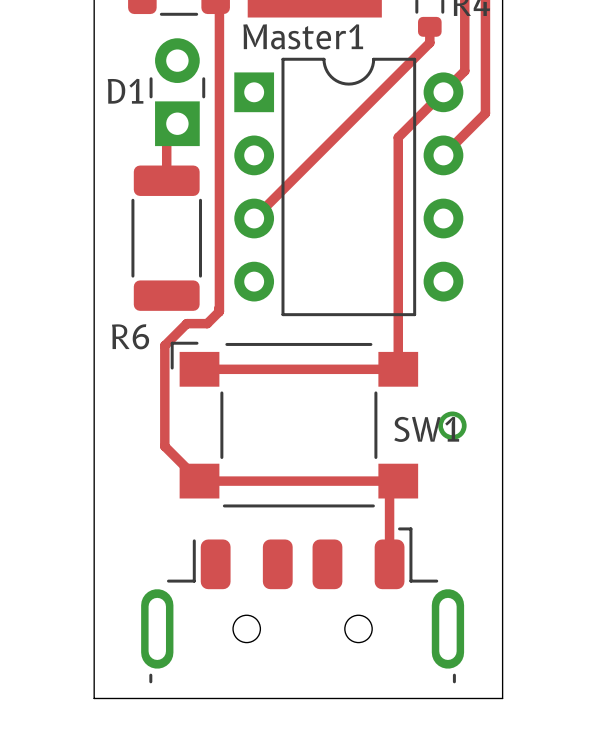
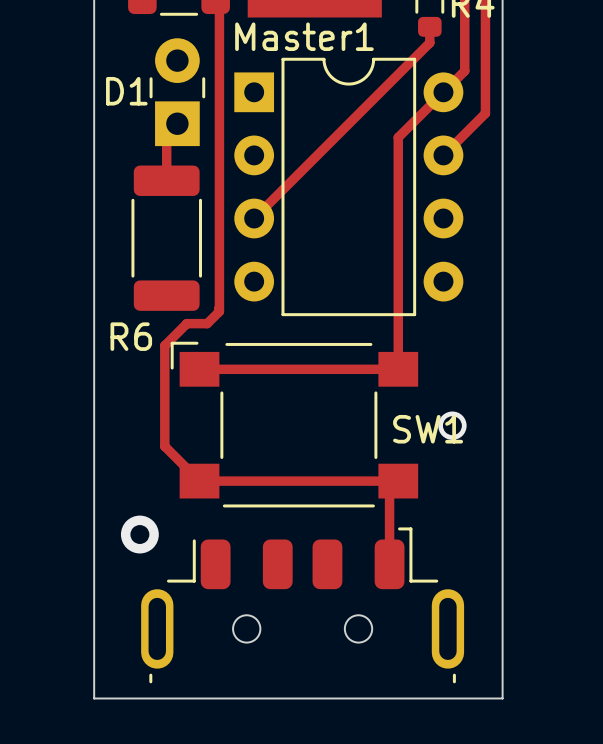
via: none -> (139, 534)

